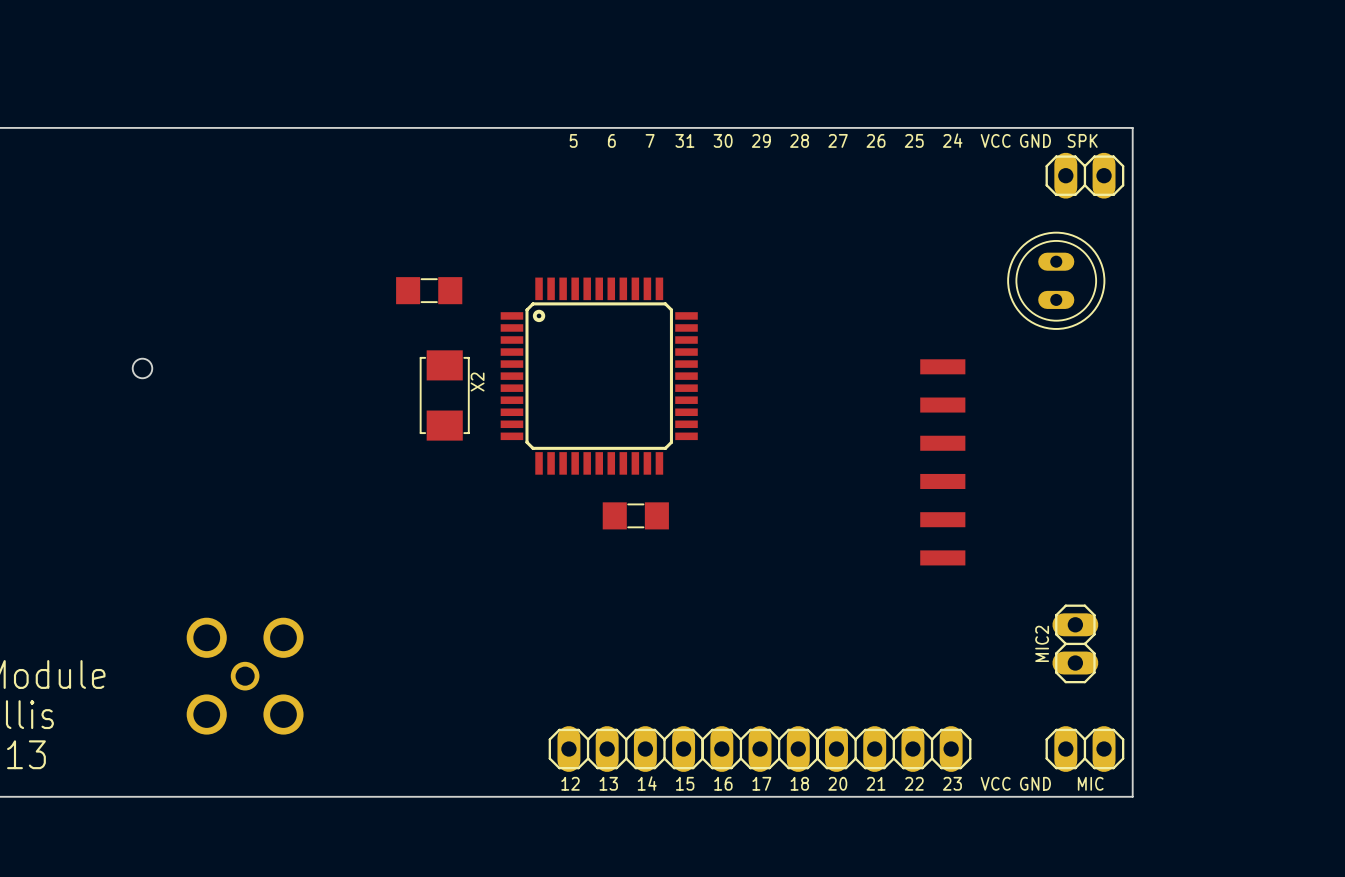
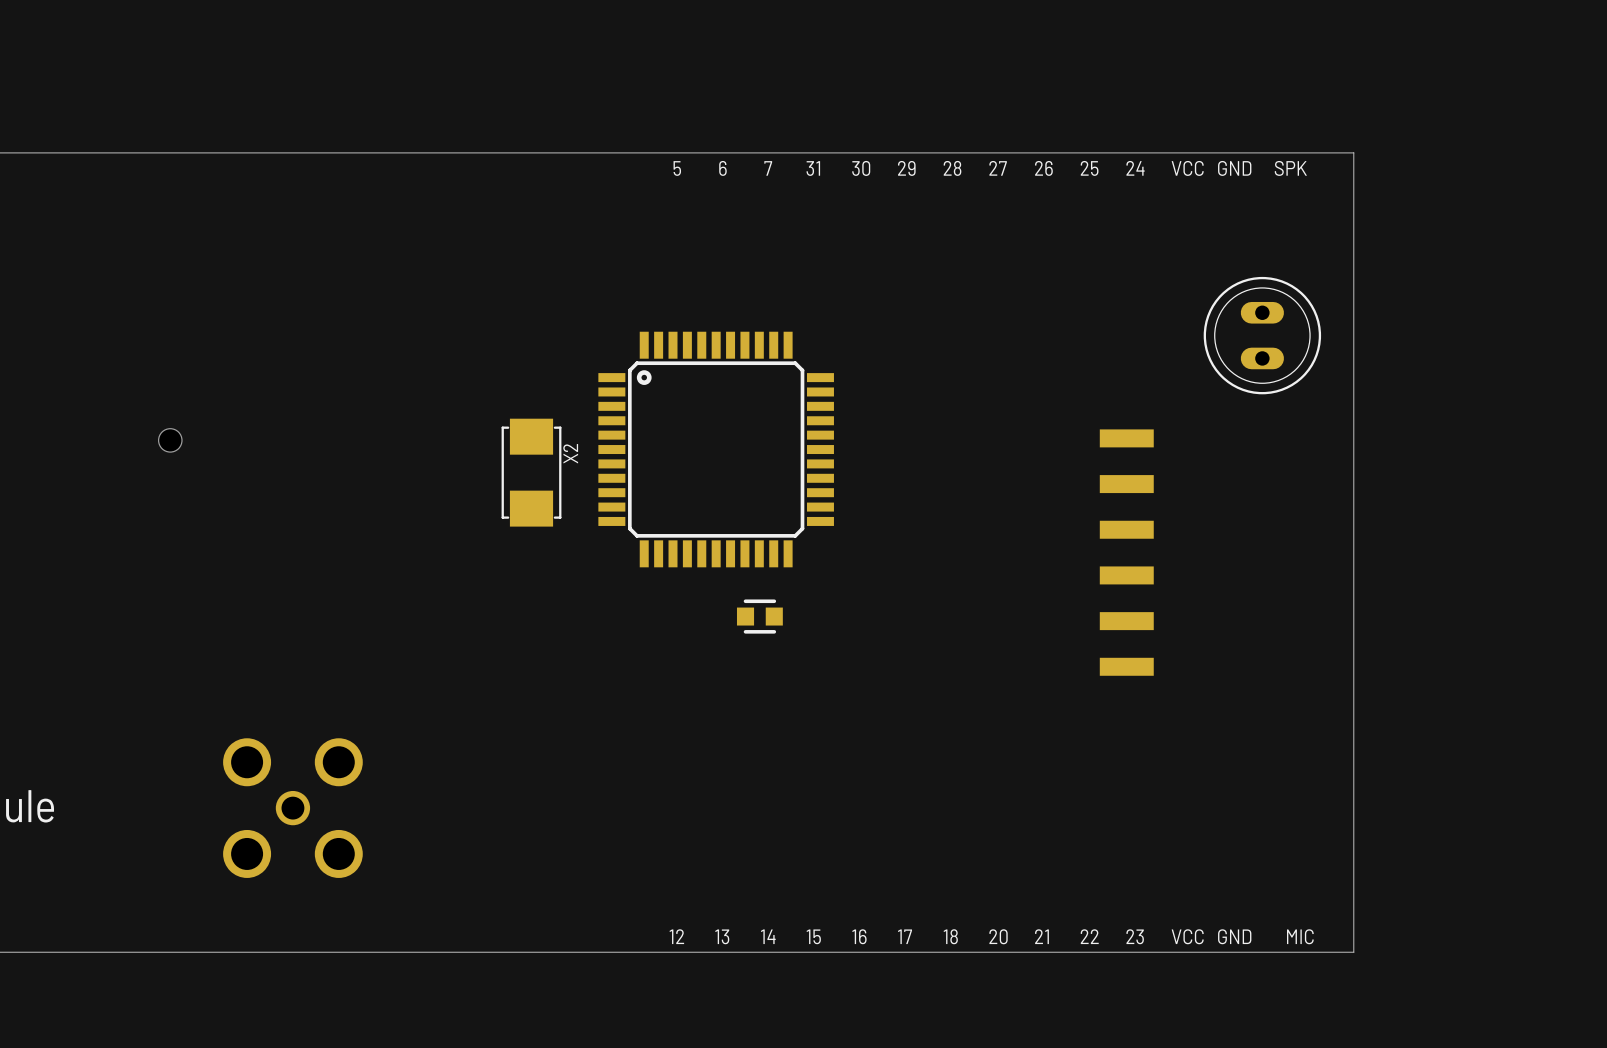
part: (1084, 175) -> none
part: (429, 290) -> none
part footprint: [602, 502, 669, 530] -> [736, 599, 783, 634]
MIC2: (1075, 643) -> none
part: (626, 749) -> none
part: (760, 749) -> none
part: (893, 749) -> none
part: (1084, 749) -> none

